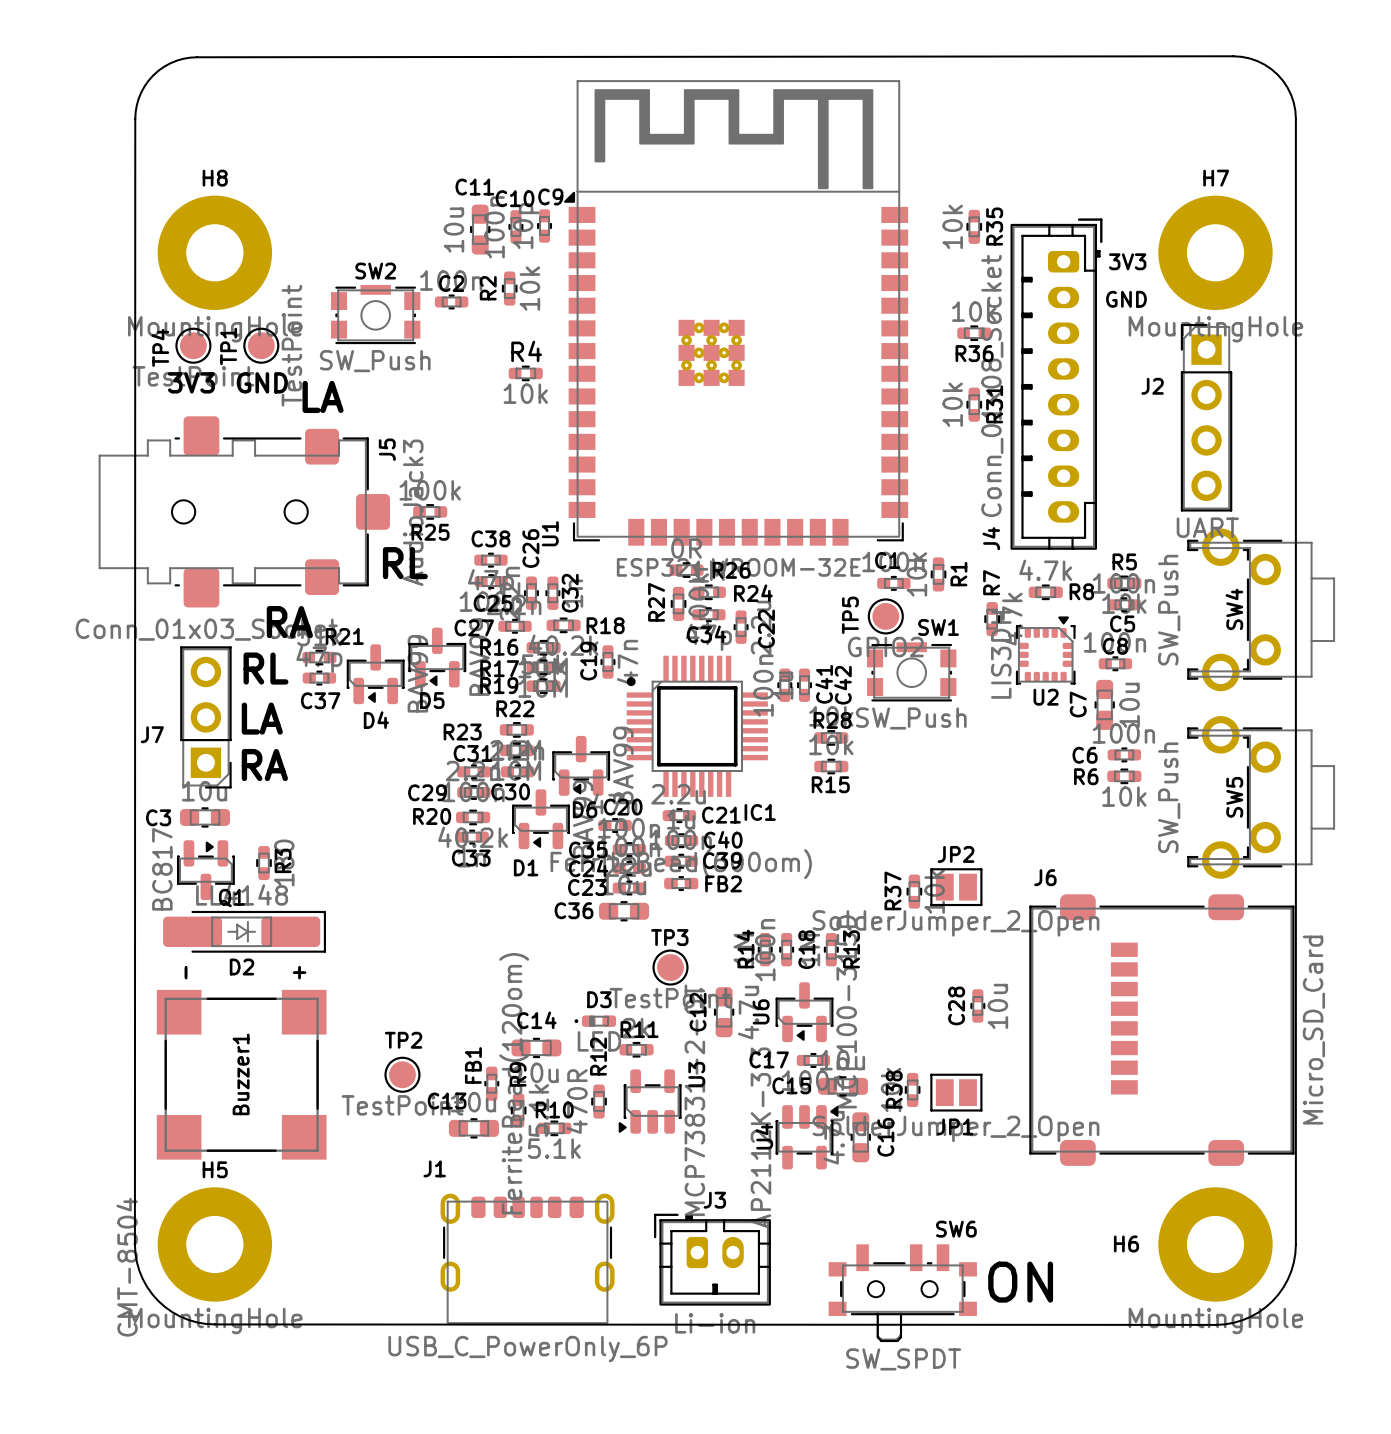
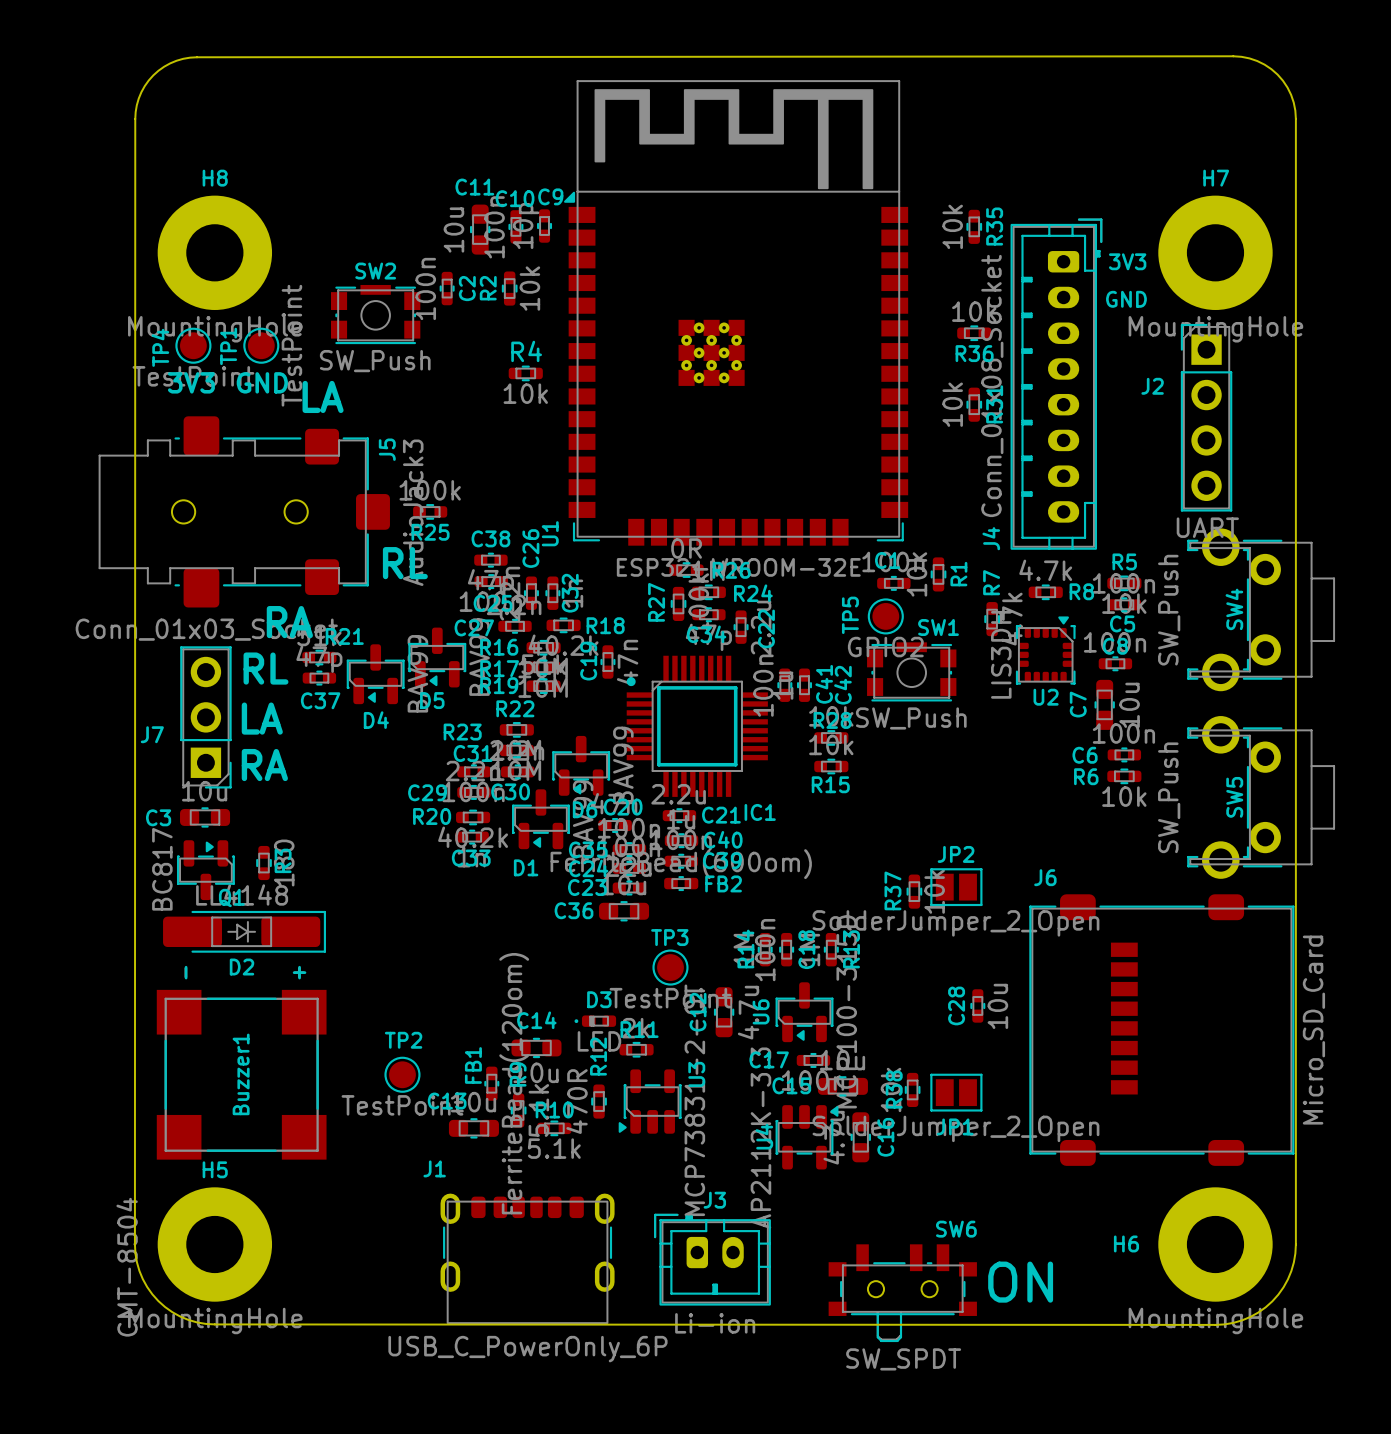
C2 rotation: 0° (451, 301) -> 90° clockwise (447, 288)

